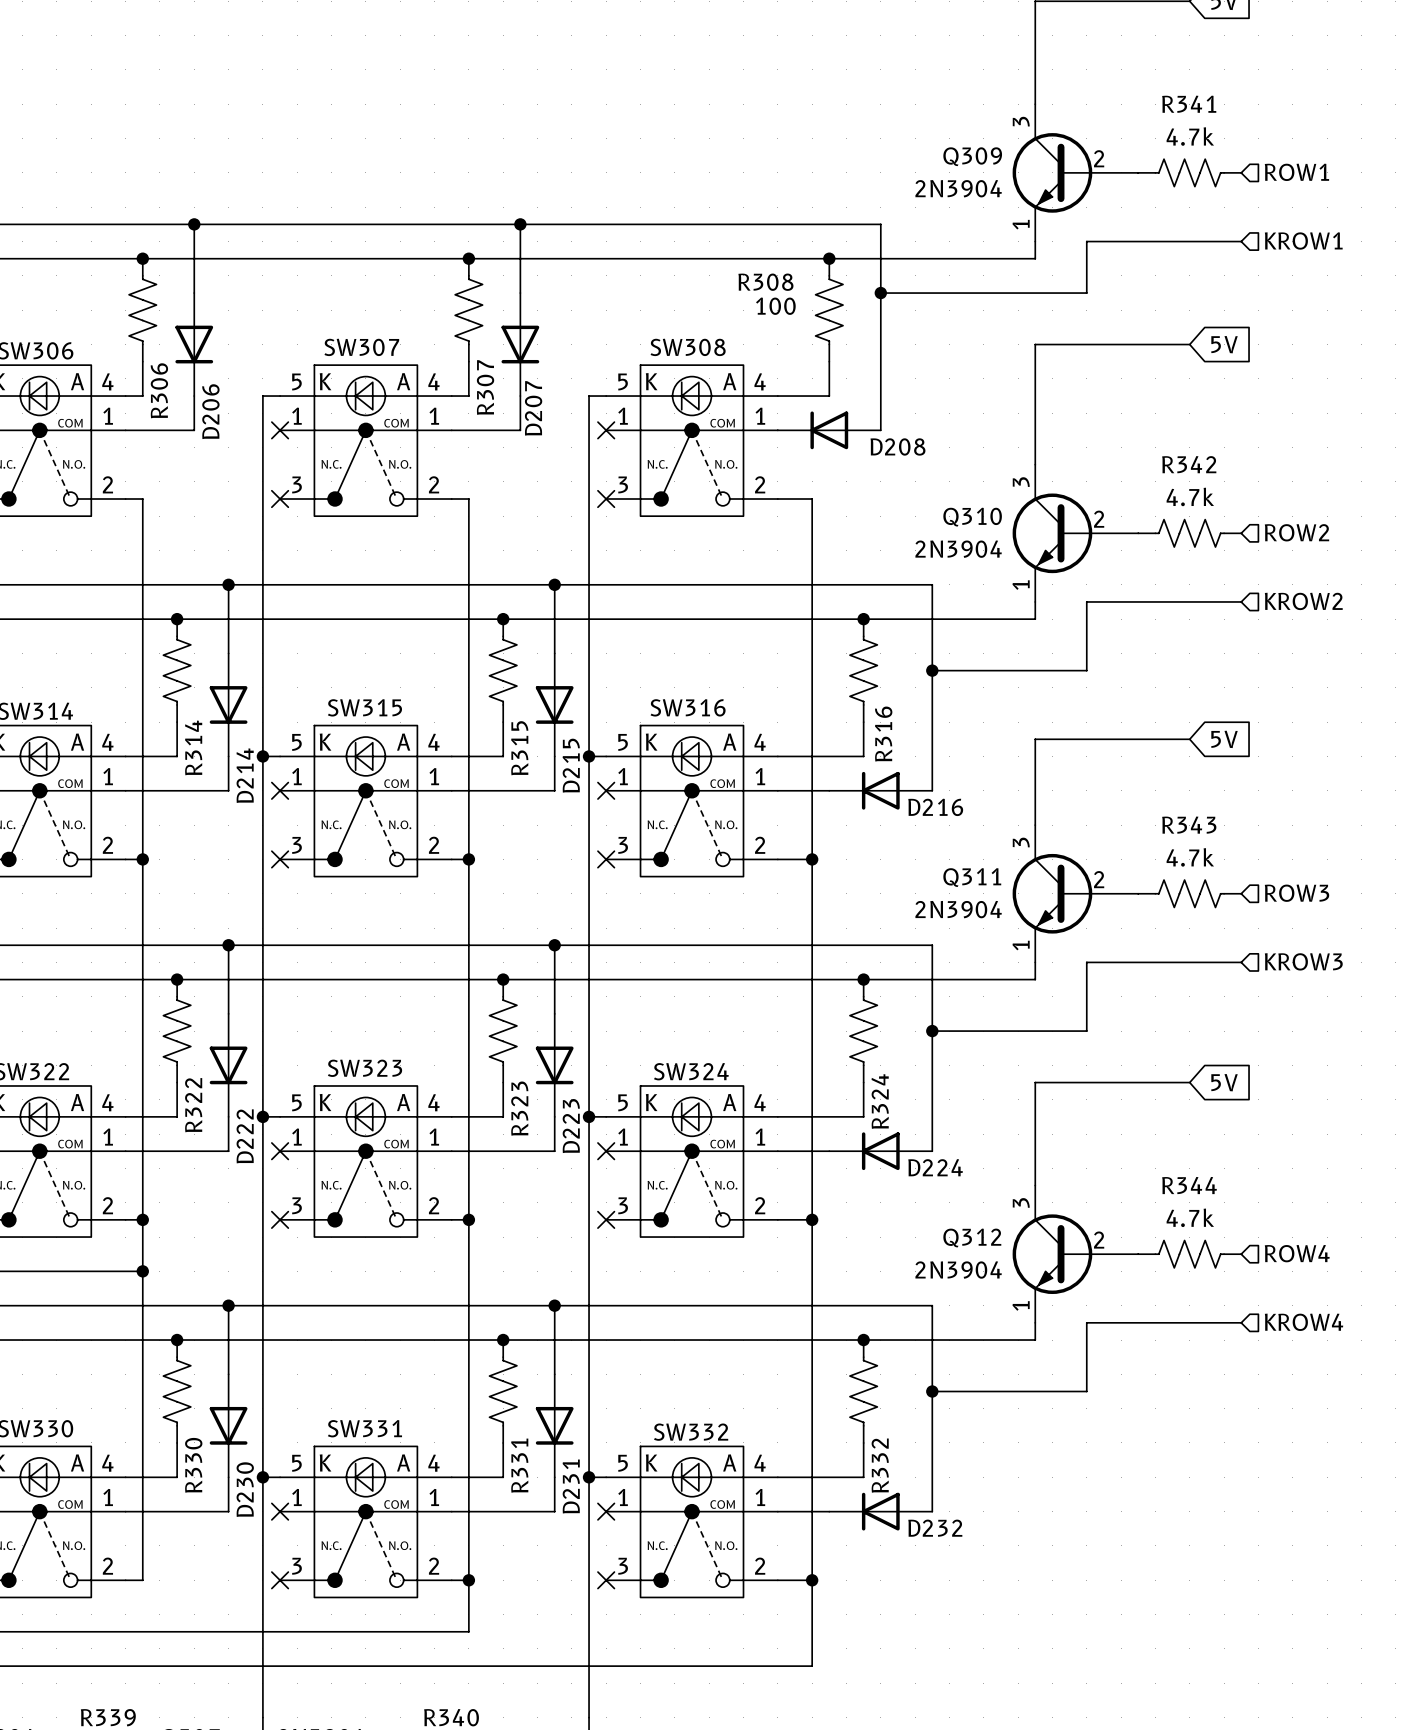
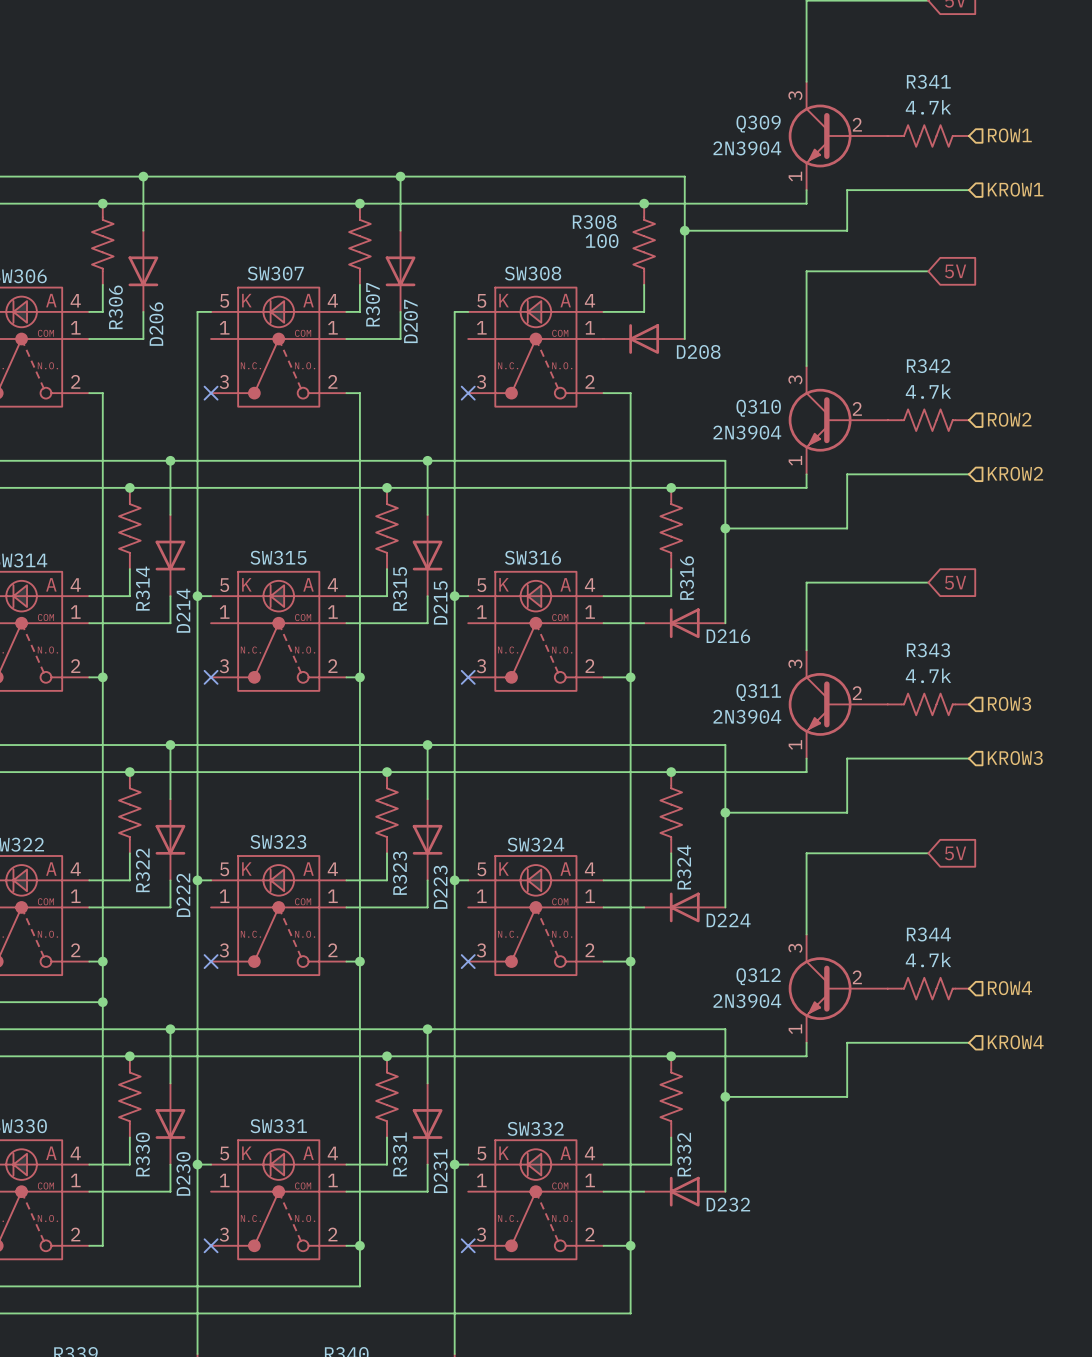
no-connect mark: (280, 430) -> none
no-connect mark: (606, 430) -> none
no-connect mark: (280, 790) -> none
no-connect mark: (606, 790) -> none
no-connect mark: (280, 1151) -> none
no-connect mark: (606, 1151) -> none
no-connect mark: (280, 1511) -> none
no-connect mark: (606, 1511) -> none

